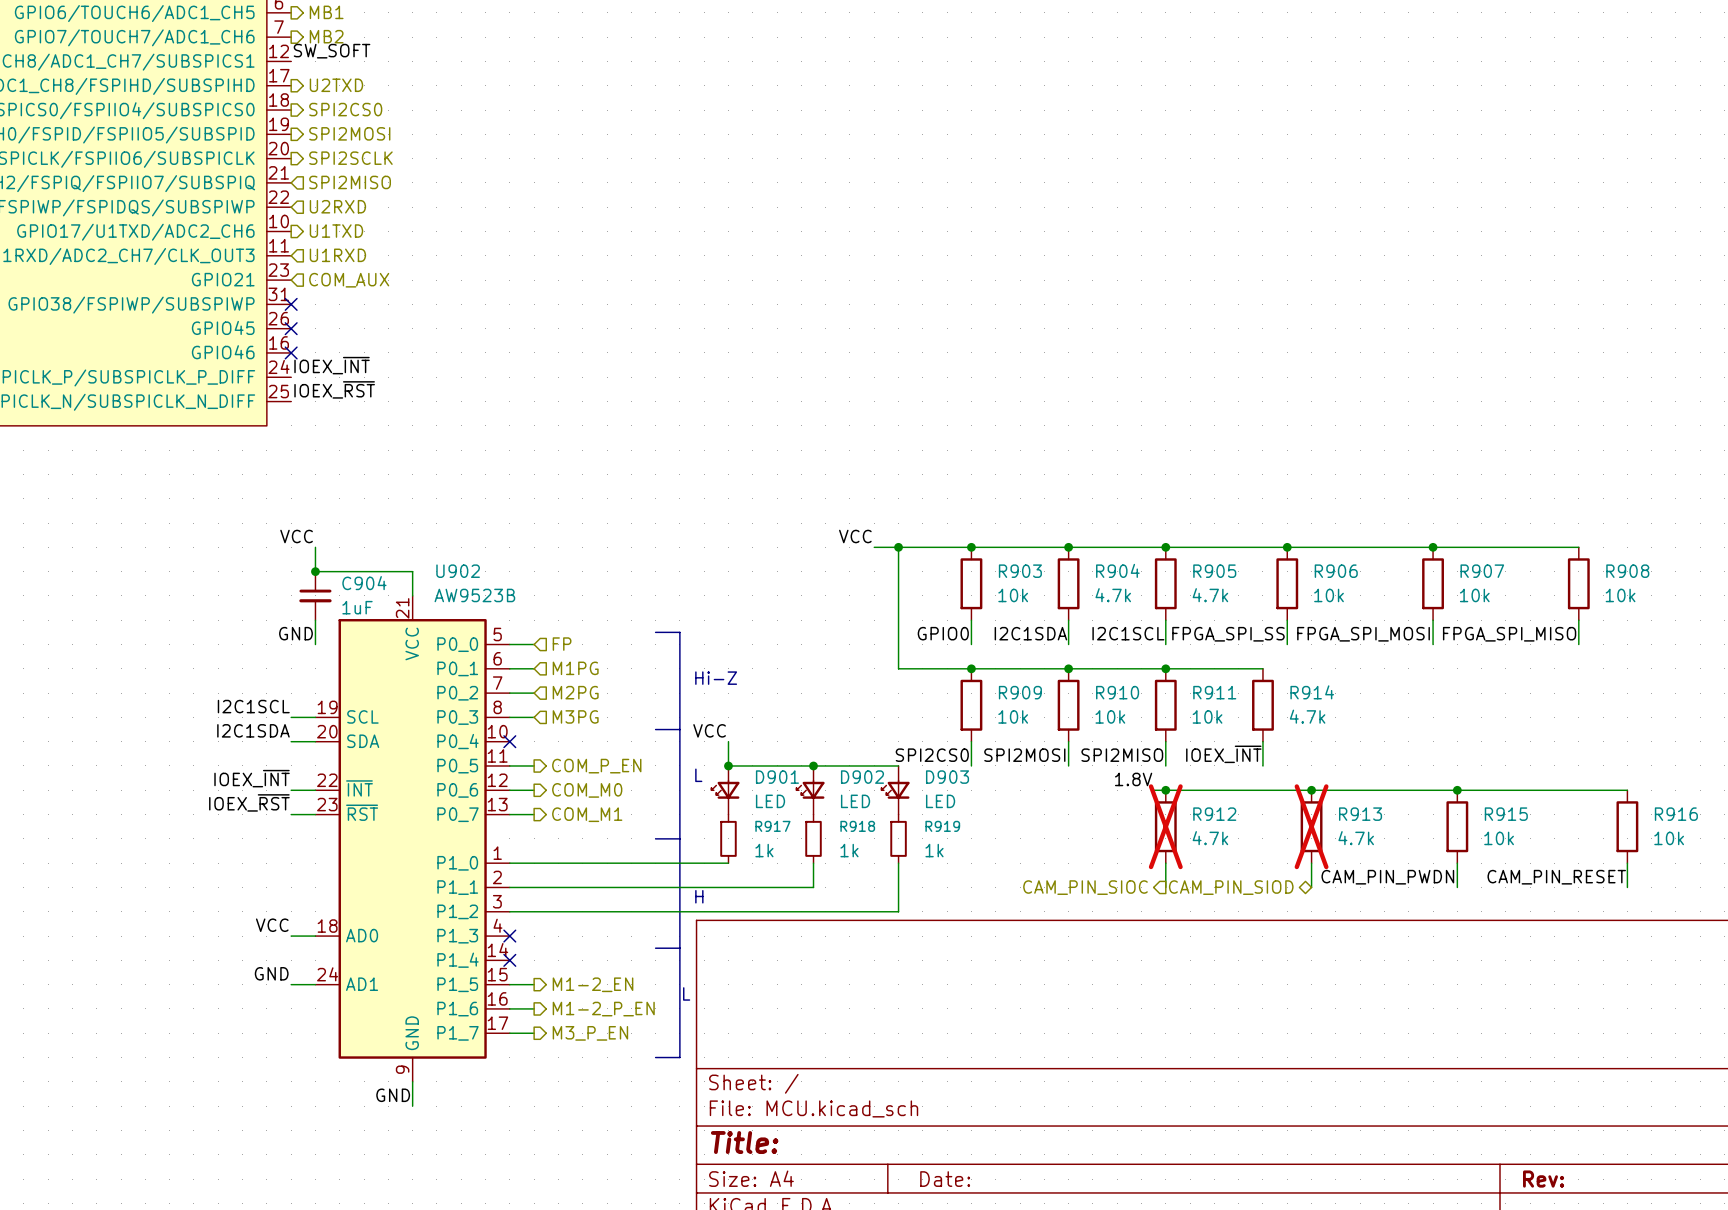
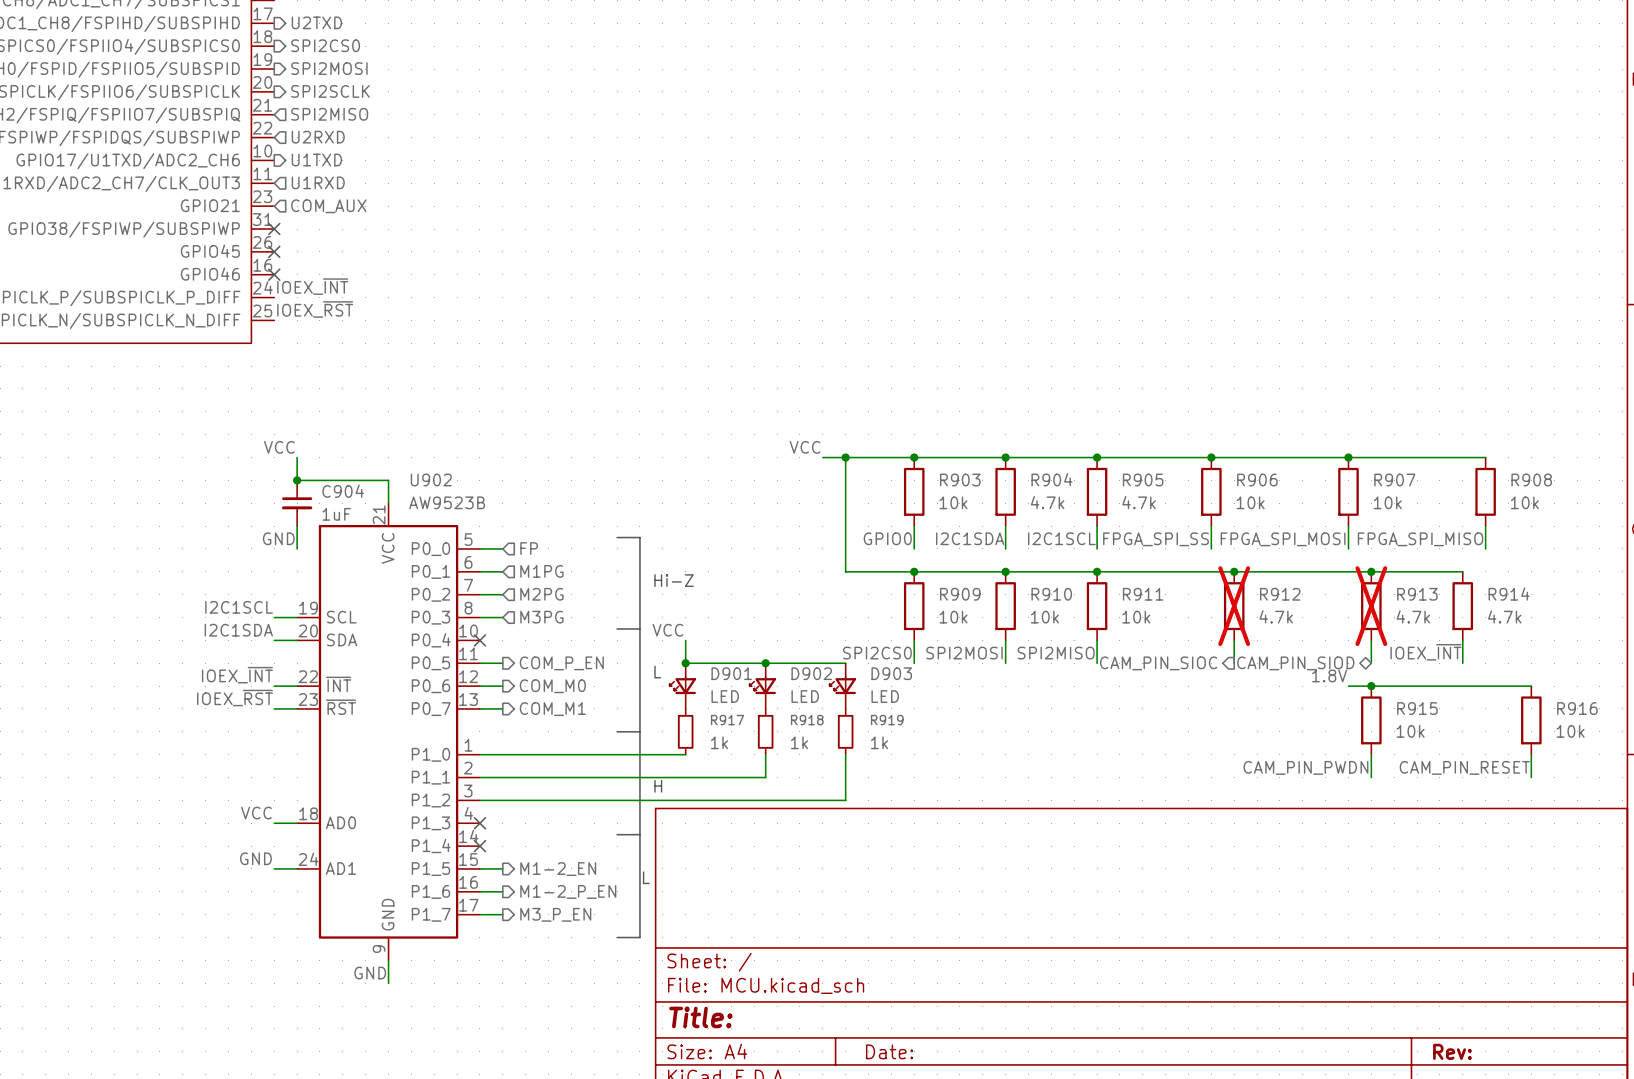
wire: none -> (1188, 571) (1462, 571)
junction: none -> (1234, 571)
junction: none -> (1371, 571)
R914 position: (1262, 705) -> (1462, 606)
wire: (1262, 741) (1262, 765) -> none
wire: none -> (1462, 640) (1462, 663)
label: IOEX_~{INT} (1223, 754) -> none
label: none -> IOEX_~{INT} (1425, 652)
label: 1.8V (1133, 779) -> none
label: none -> 1.8V (1329, 675)
wire: (1153, 790) (1433, 790) -> none
junction: (1165, 790) -> none
junction: (1311, 790) -> none
R912 position: (1165, 826) -> (1234, 606)
R913 position: (1311, 826) -> (1371, 606)
wire: (1165, 863) (1165, 887) -> (1234, 640) (1234, 663)
wire: (1311, 863) (1311, 887) -> (1371, 640) (1371, 663)
hierarchical label position: CAM_PIN_SIOC (1085, 887) -> CAM_PIN_SIOC (1158, 663)
hierarchical label position: CAM_PIN_SIOD (1231, 887) -> CAM_PIN_SIOD (1295, 663)

